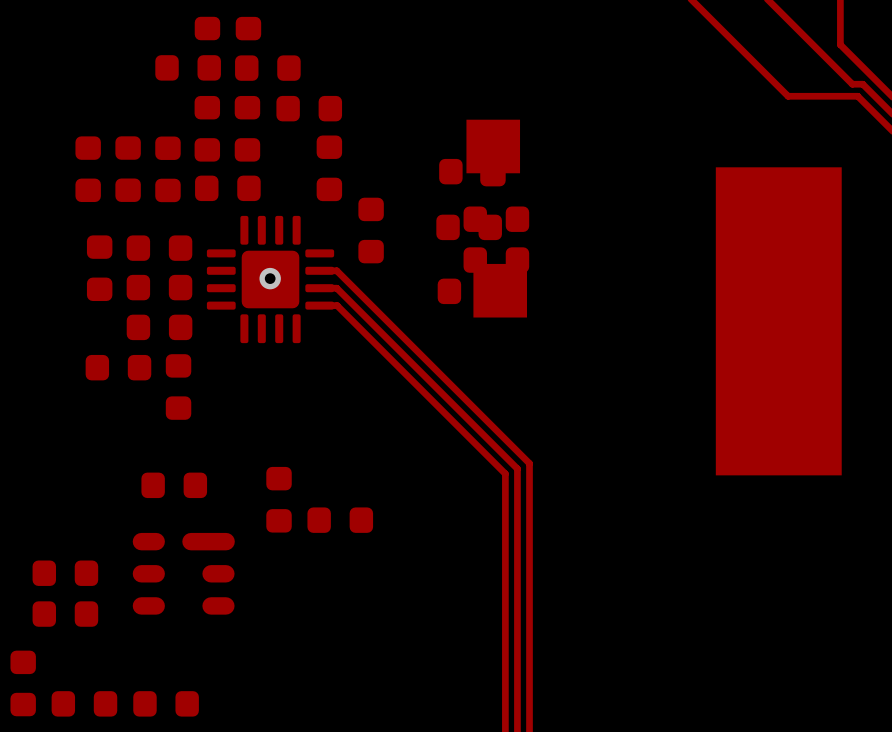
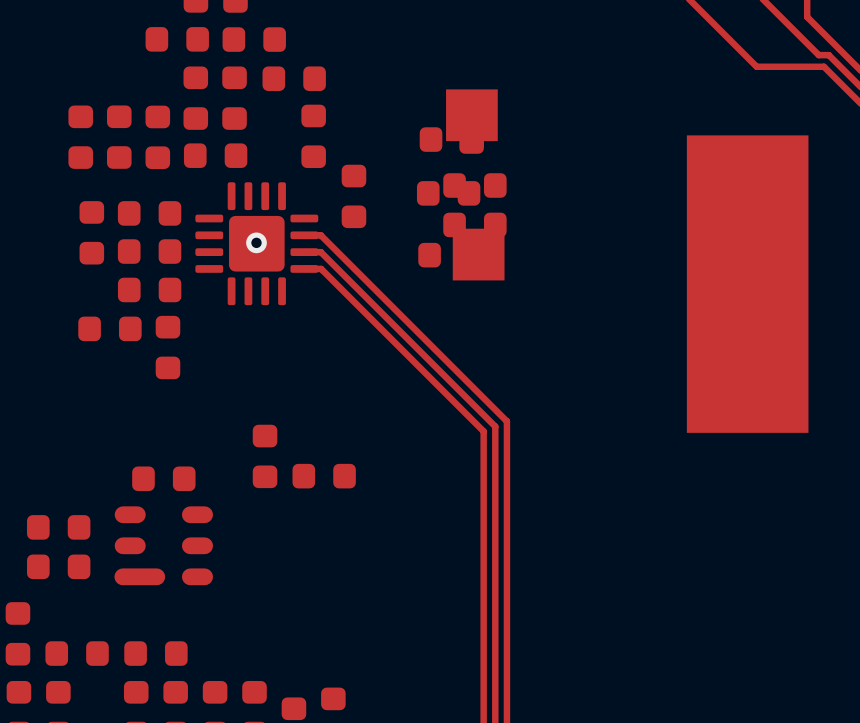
part position: (174, 485) -> (163, 478)
part rotation: 0° (183, 573) -> 180° (163, 545)

